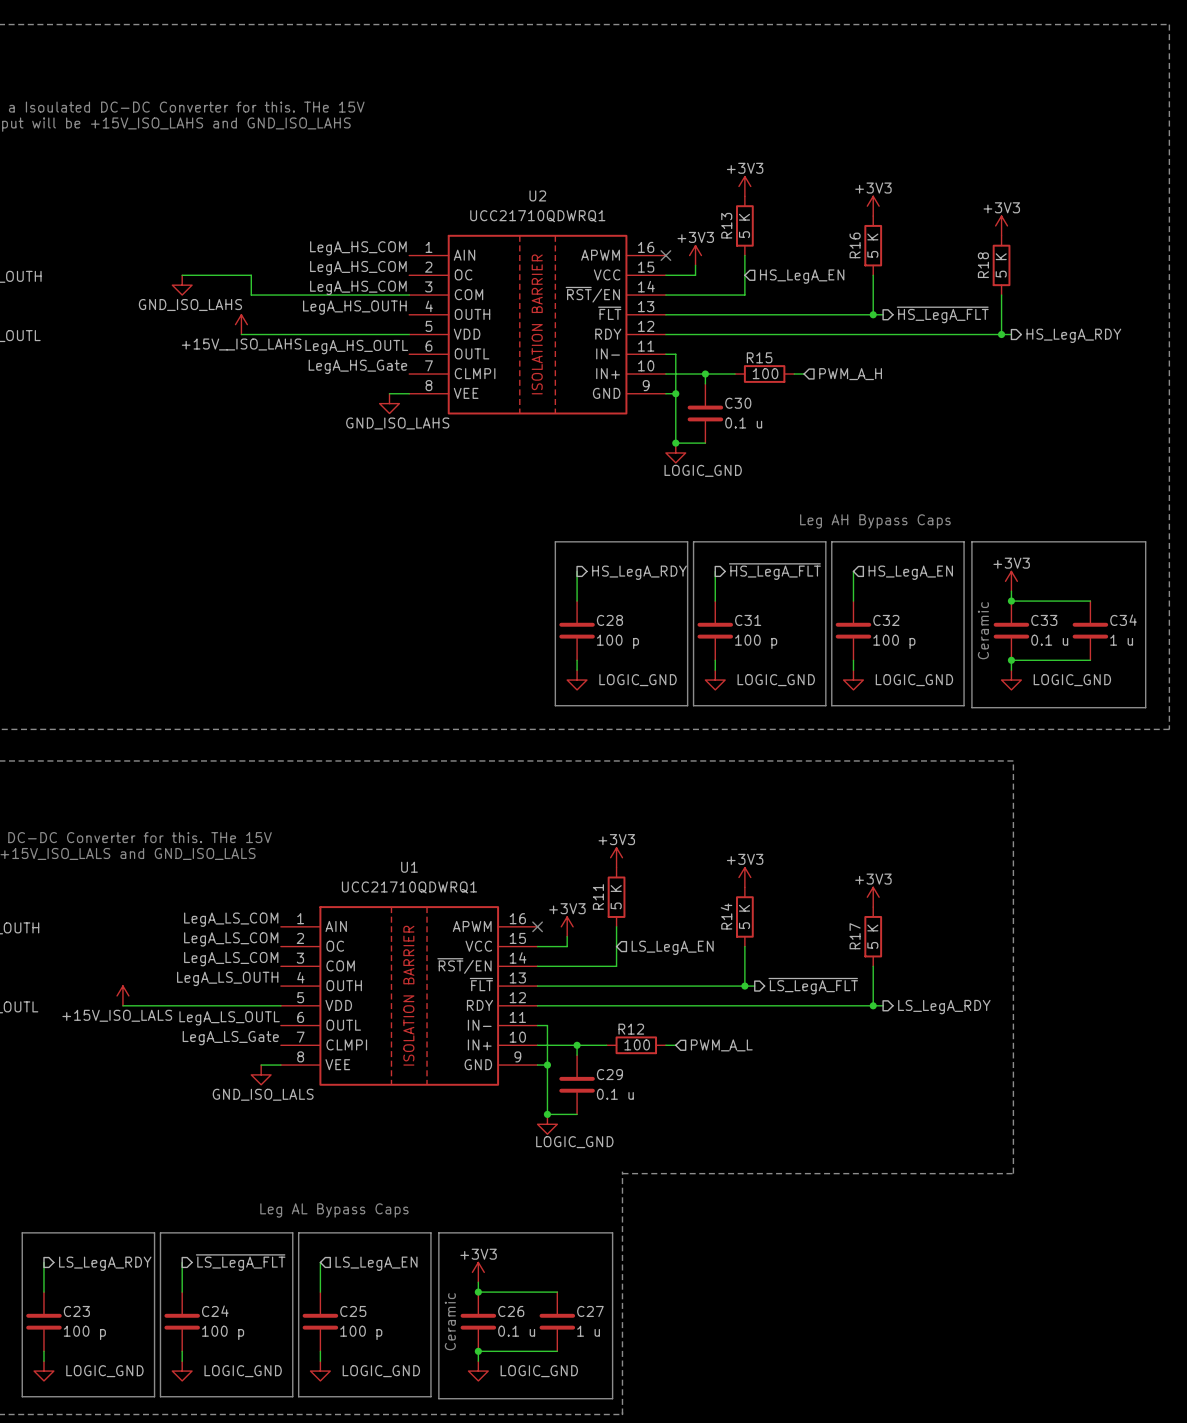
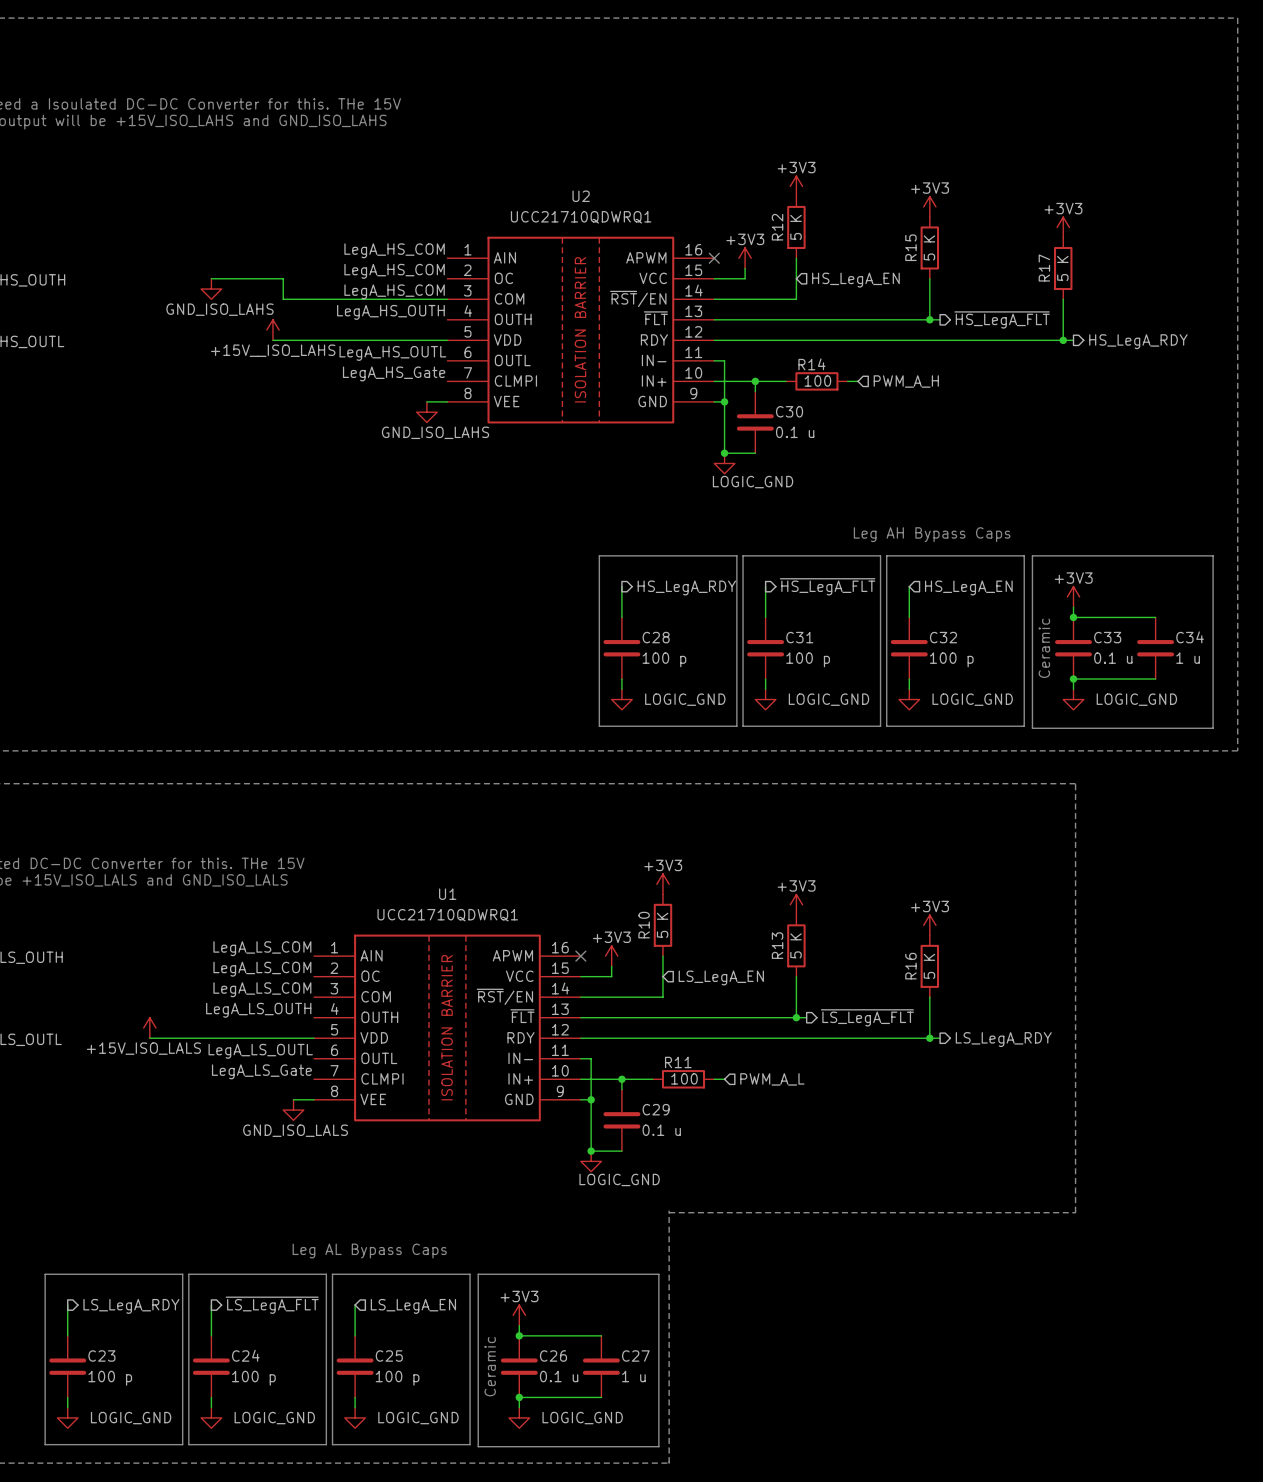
R13 name: R13 (726, 225) -> R12 (777, 227)
R16 name: R16 (855, 245) -> R15 (910, 247)
R18 name: R18 (983, 265) -> R17 (1044, 268)
R15 name: R15 (759, 357) -> R14 (811, 364)
R11 name: R11 (598, 896) -> R10 (644, 925)
R14 name: R14 (726, 916) -> R13 (777, 945)
R17 name: R17 (855, 936) -> R16 (910, 966)
R12 name: R12 (631, 1029) -> R11 (678, 1062)

